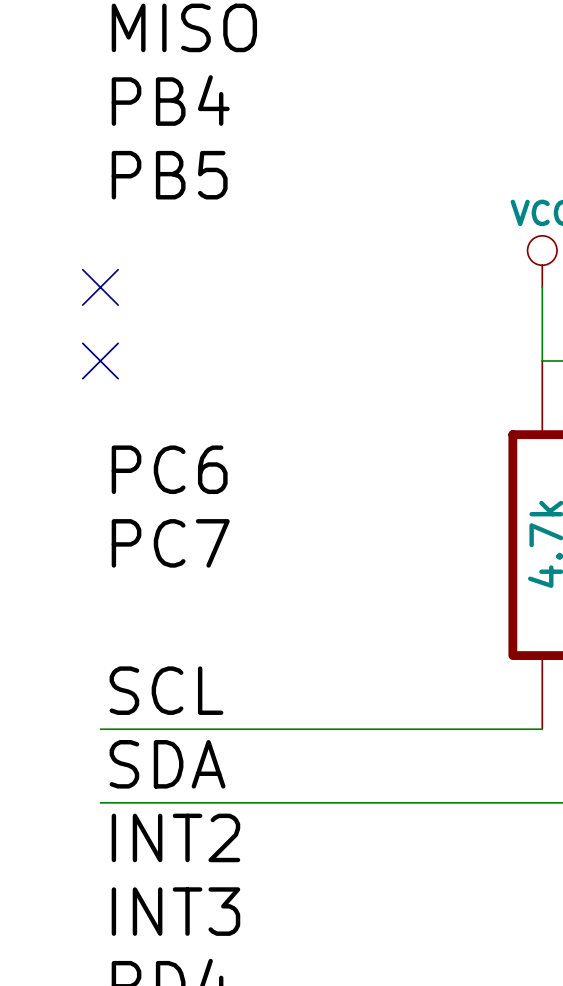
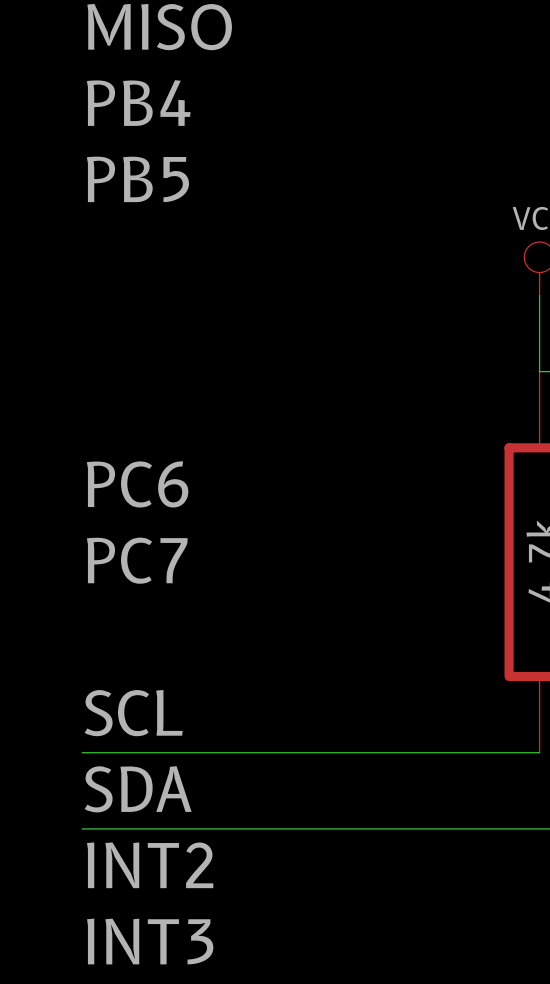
no-connect mark: (100, 287) -> none
no-connect mark: (100, 361) -> none

